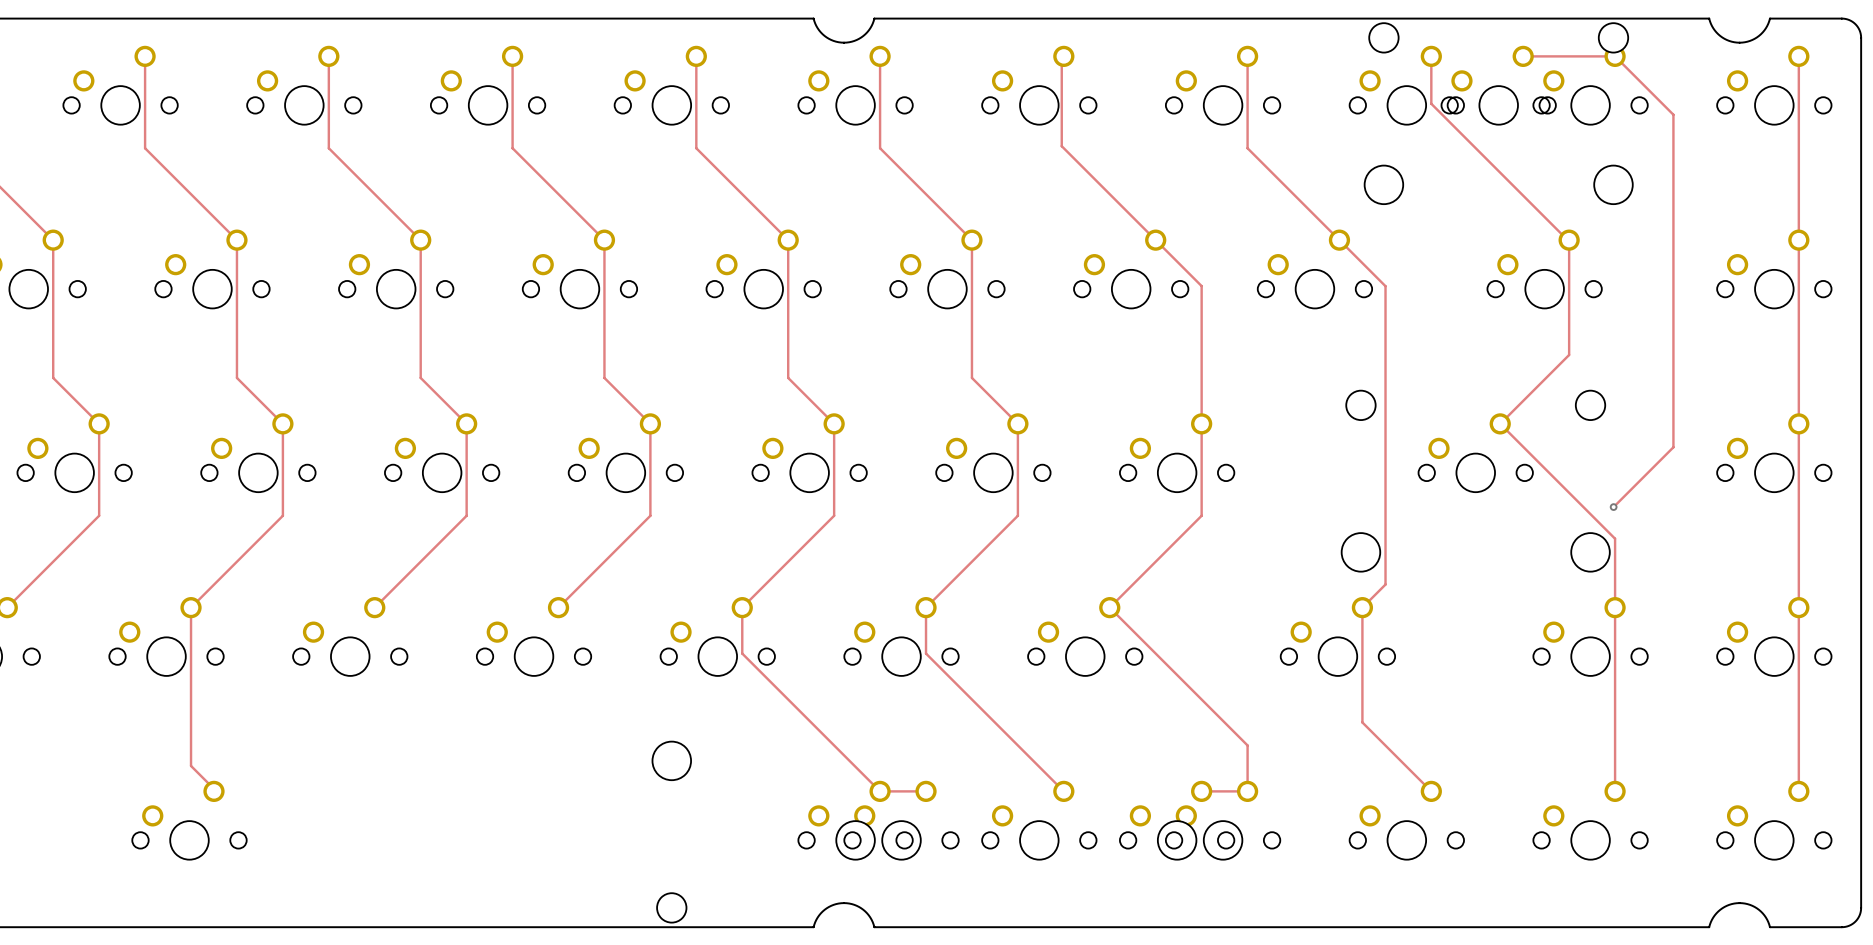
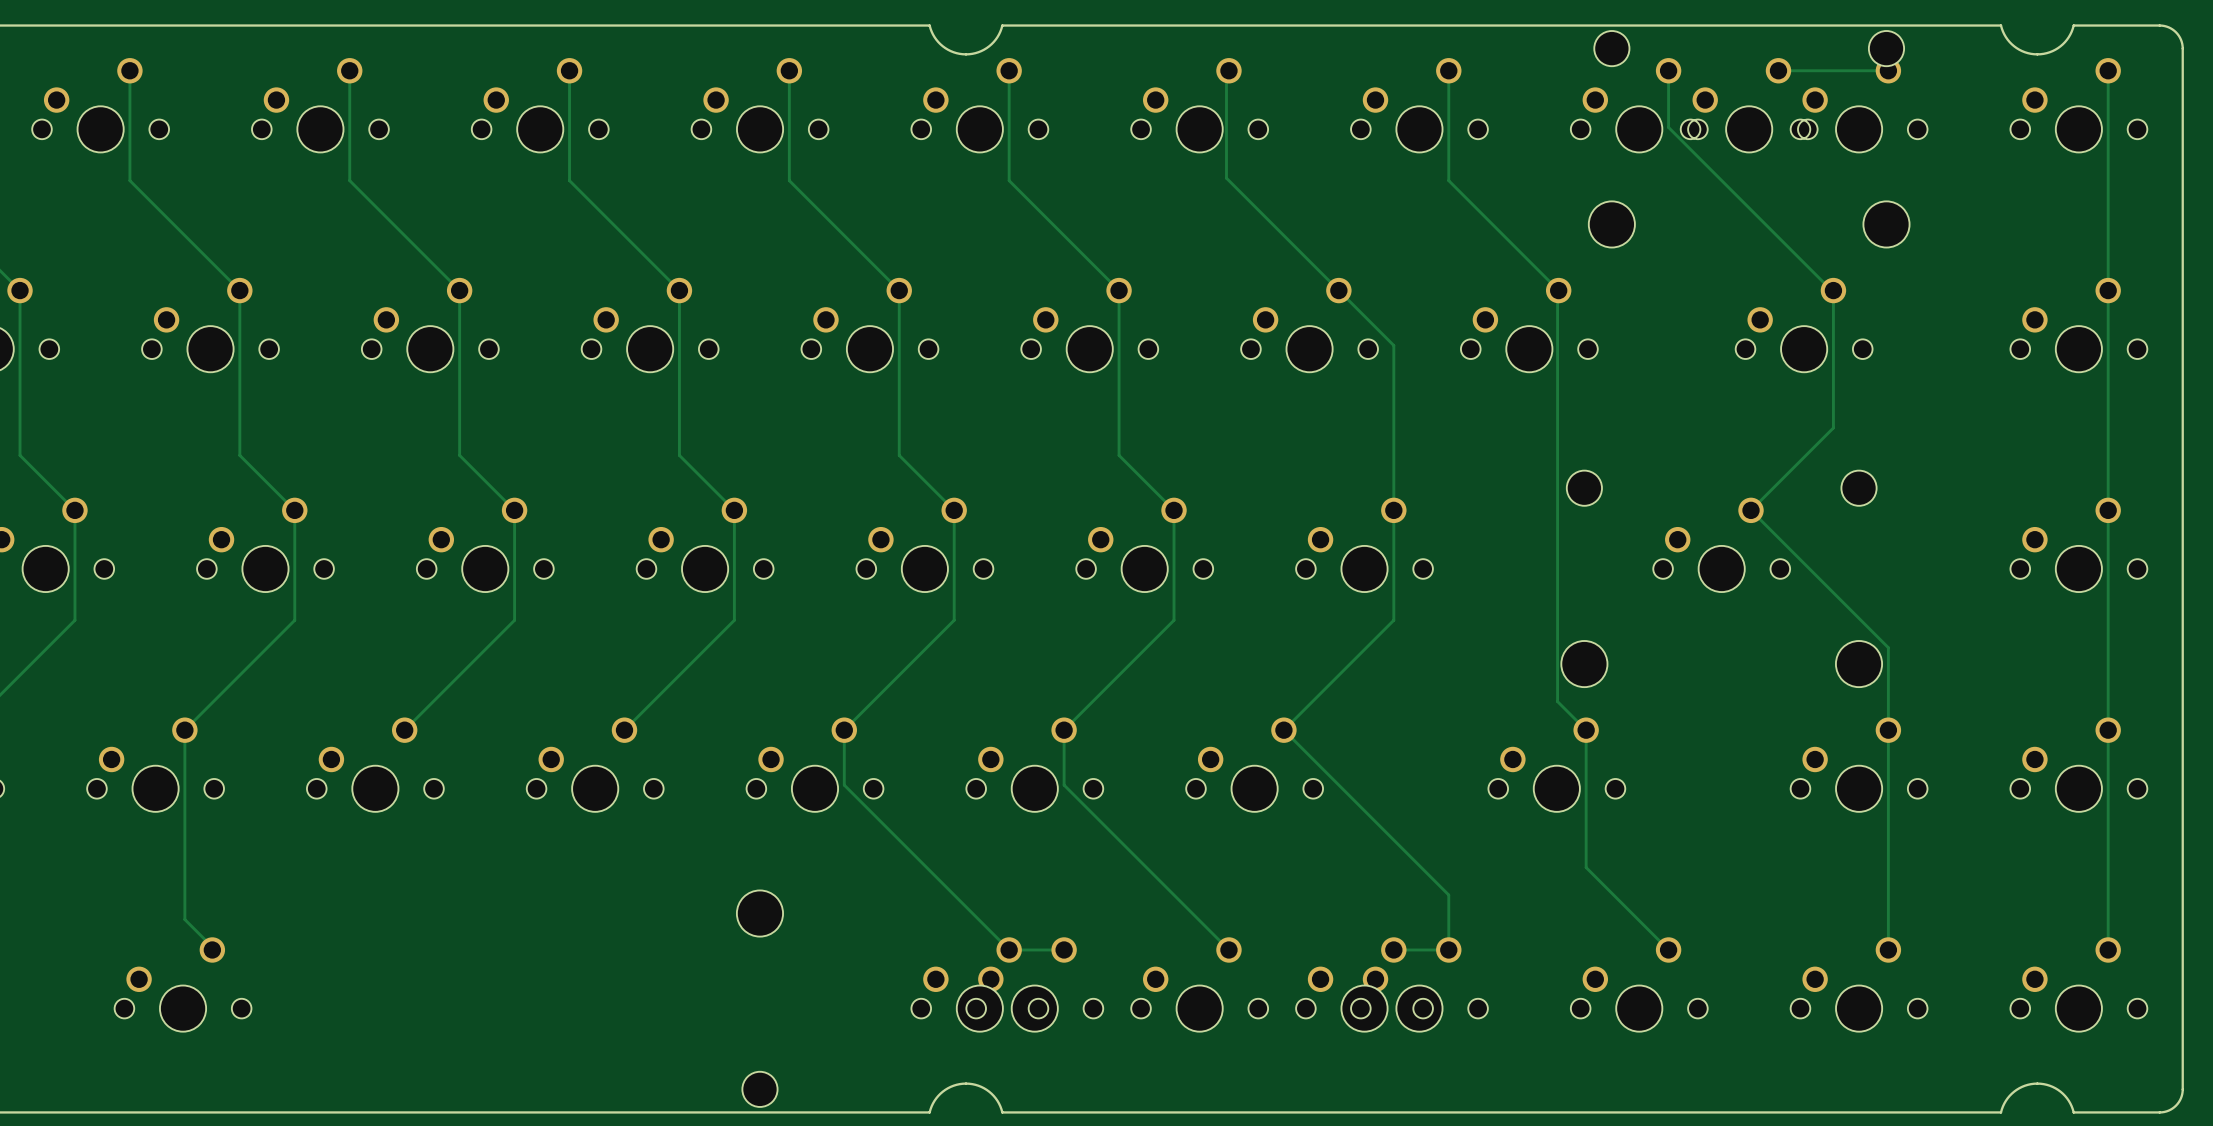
track: (1615, 56) (1673, 114) (1673, 447) (1613, 507) -> none
track: (1339, 240) (1385, 286) (1385, 584) (1362, 607) -> (1558, 290) (1557, 701) (1586, 730)
via: (1613, 507) -> none

